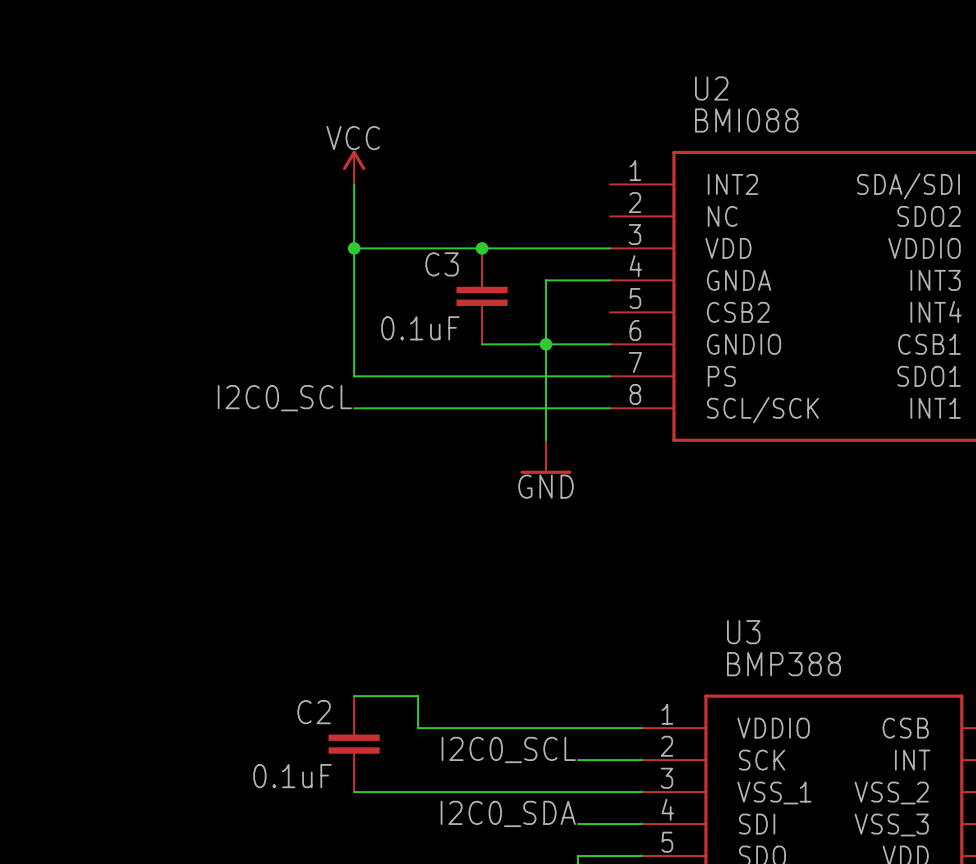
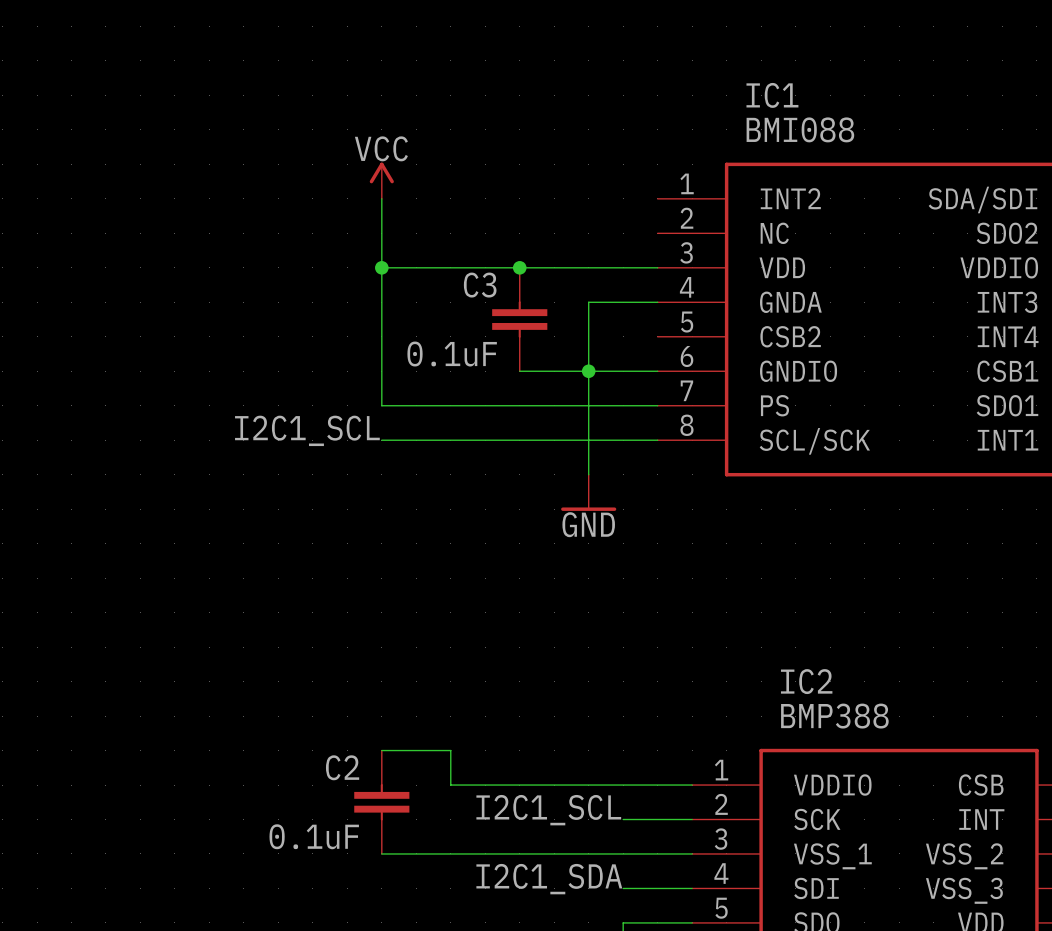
U2 name: U2 (711, 88) -> IC1 (772, 95)
label: I2C0_SCL (284, 398) -> I2C1_SCL (307, 430)
U3 name: U3 (743, 632) -> IC2 (806, 681)
label: I2C0_SCL (508, 749) -> I2C1_SCL (548, 810)
label: I2C0_SDA (508, 813) -> I2C1_SDA (549, 879)

